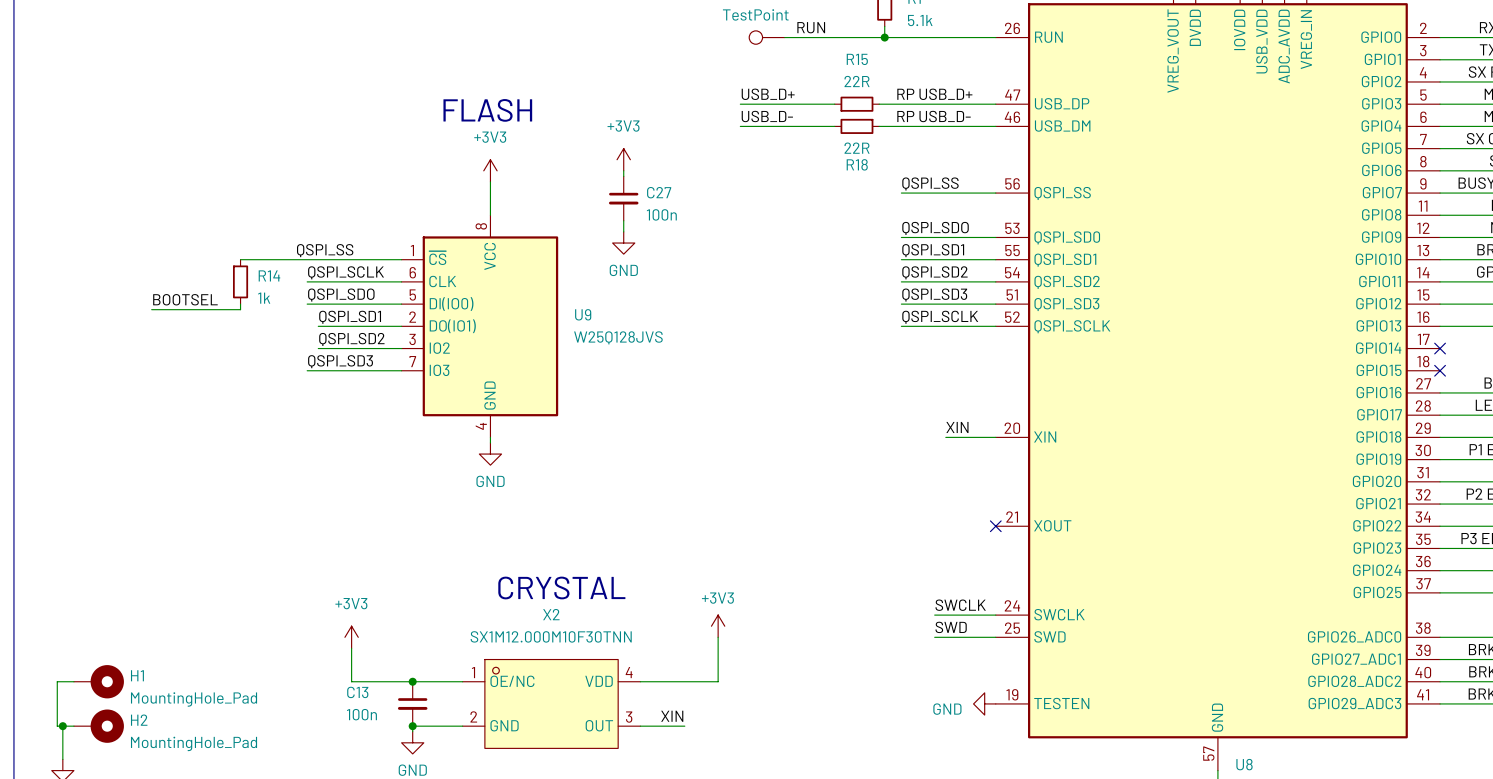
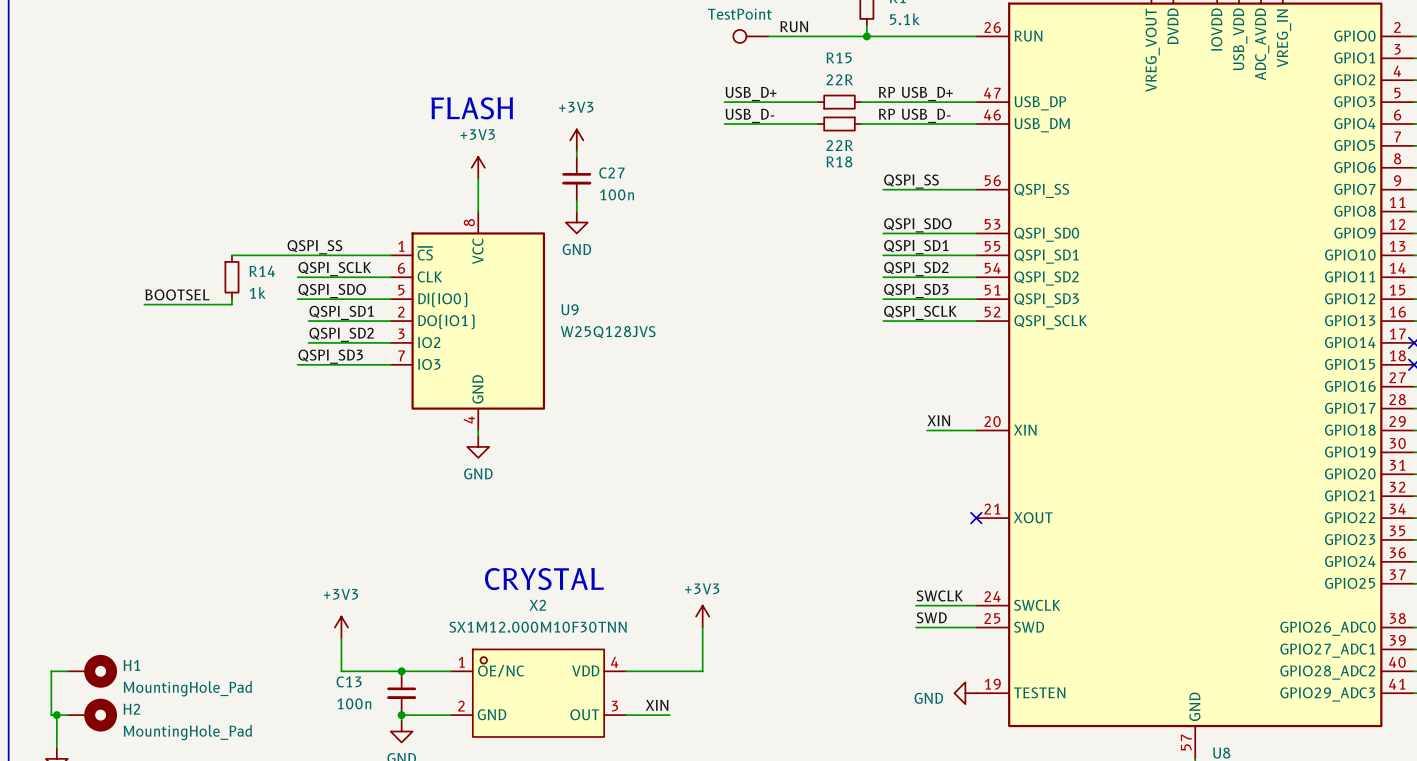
power symbol position: +3V3 (623, 159) -> +3V3 (576, 140)
wire: (623, 170) (623, 176) -> (576, 151) (576, 156)
C27 position: (623, 198) -> (576, 178)
wire: (623, 220) (623, 231) -> (576, 200) (576, 211)
power symbol position: GND (623, 243) -> GND (576, 222)

